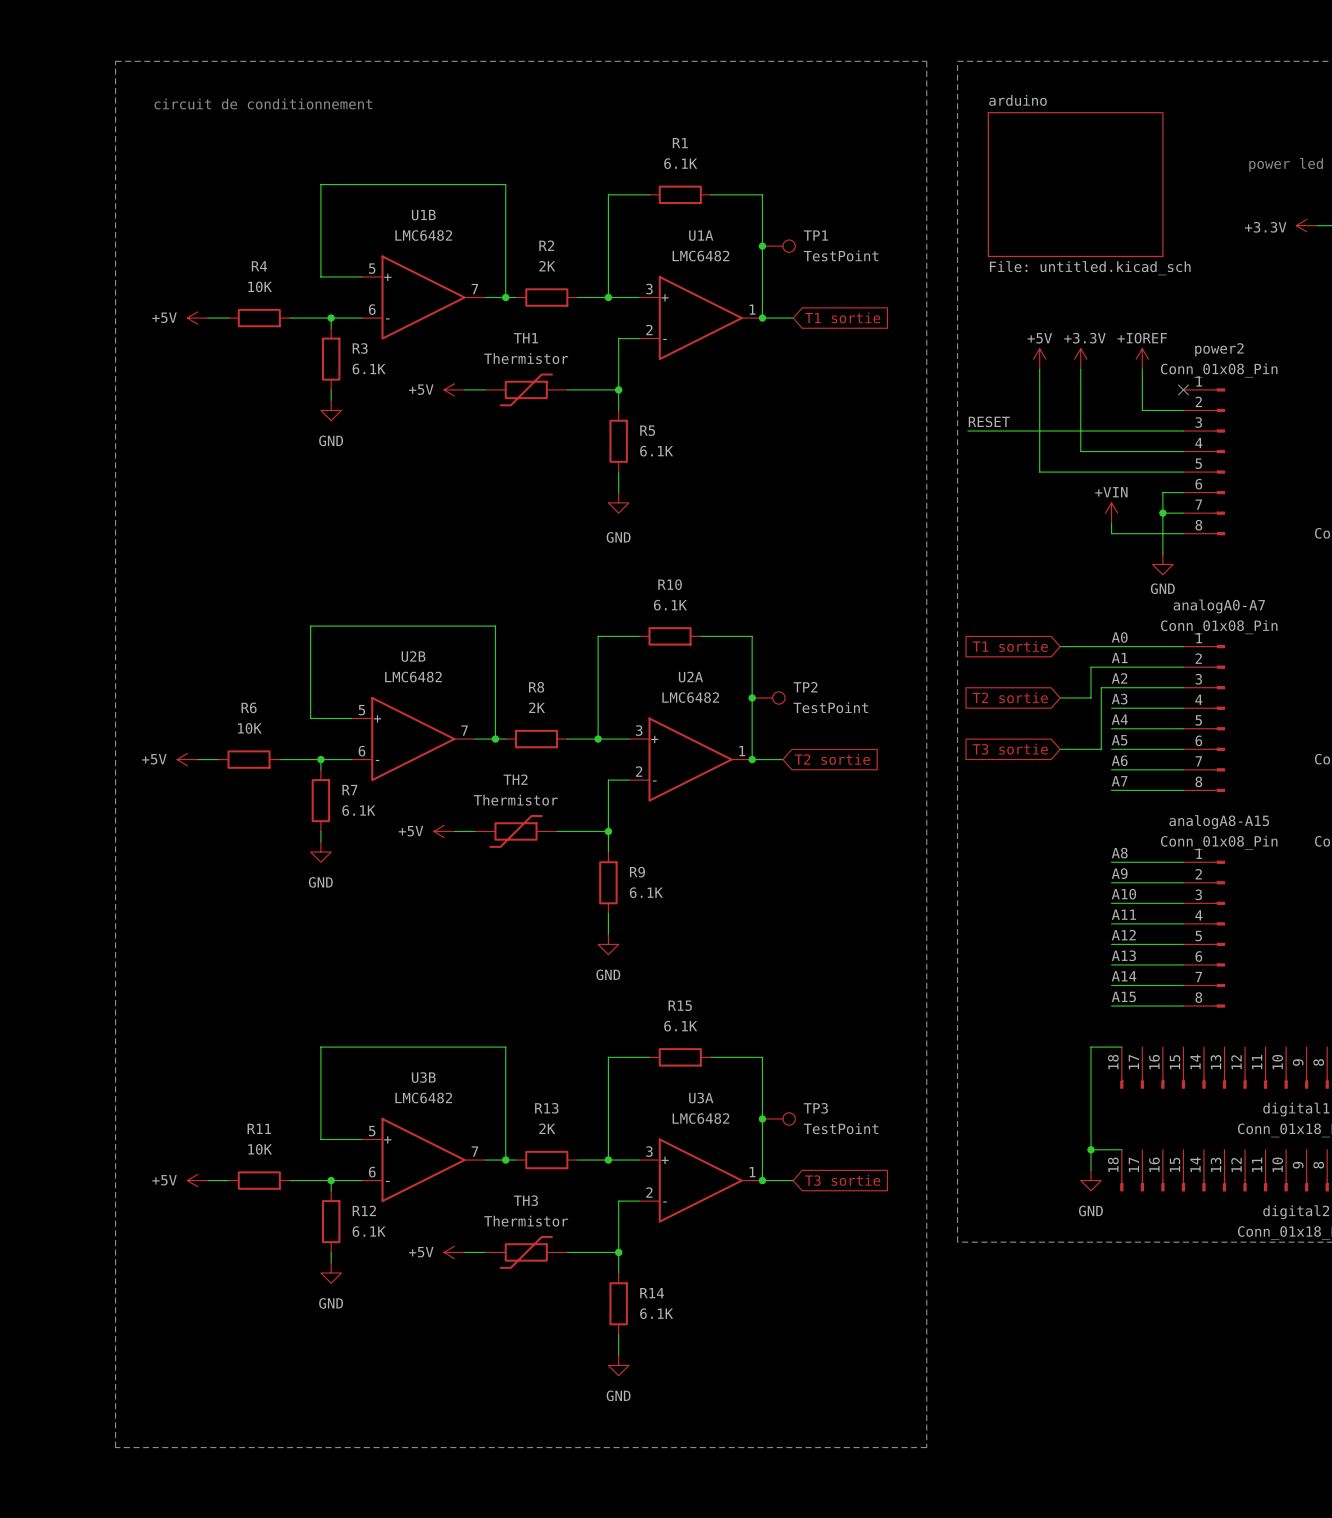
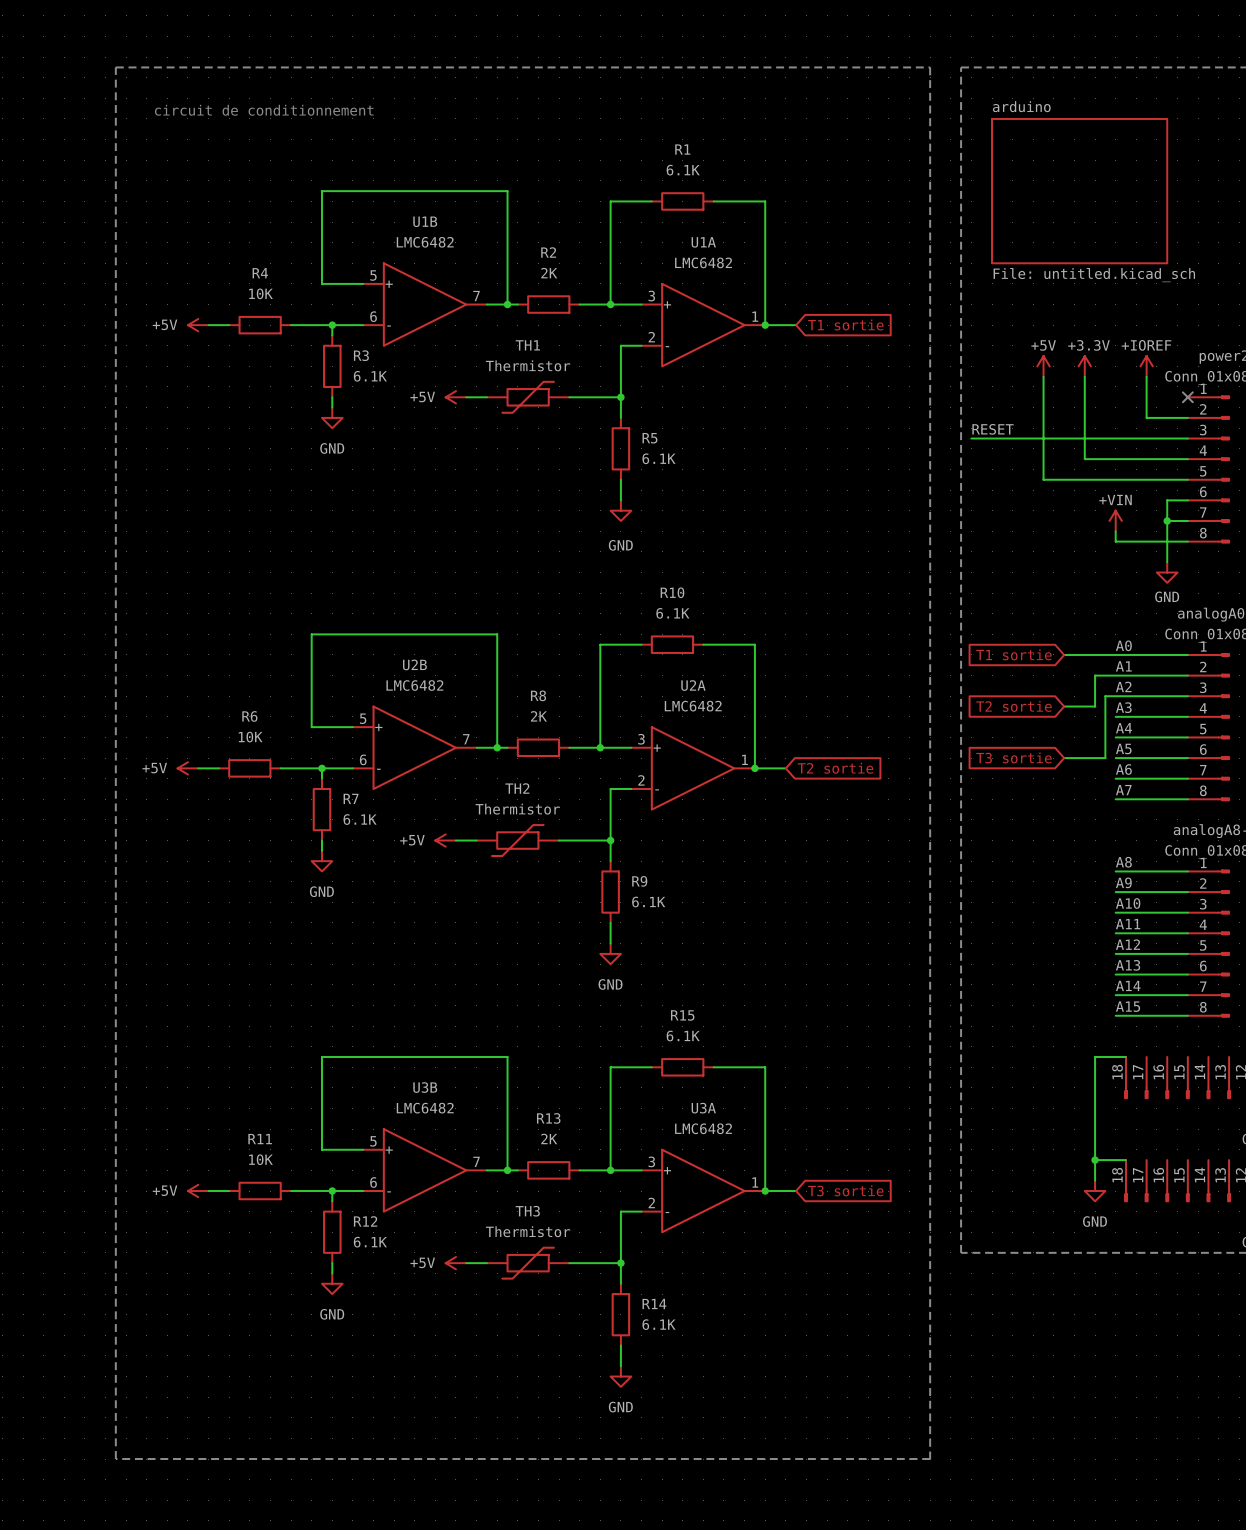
junction: (762, 246) -> none
TP1: TestPoint (778, 246) -> none
junction: (752, 697) -> none
TP2: TestPoint (768, 697) -> none
junction: (762, 1118) -> none
TP3: TestPoint (778, 1118) -> none

